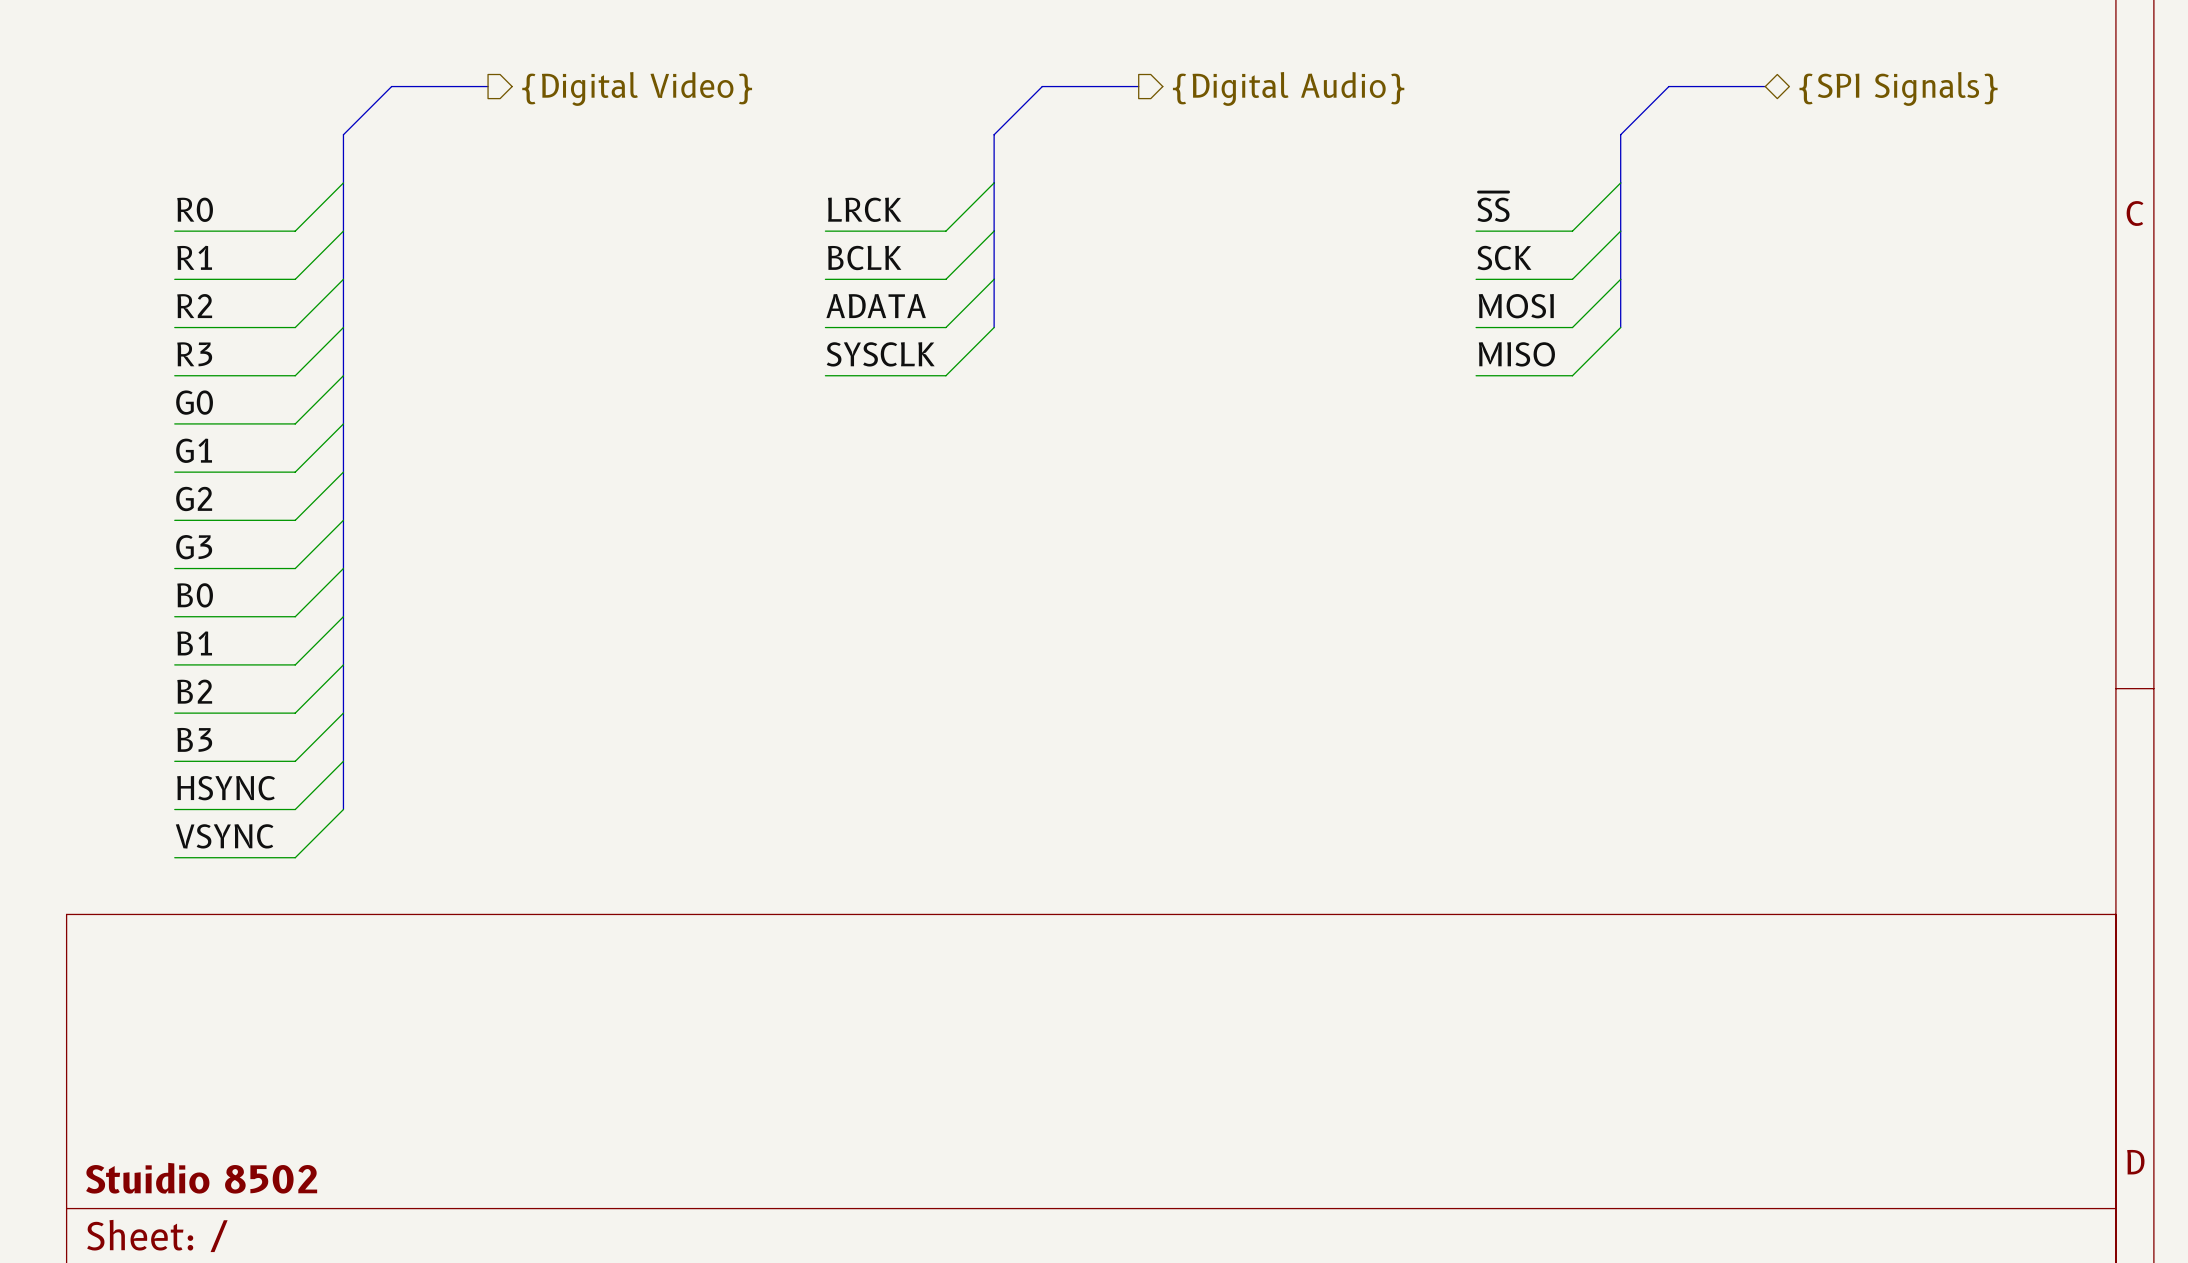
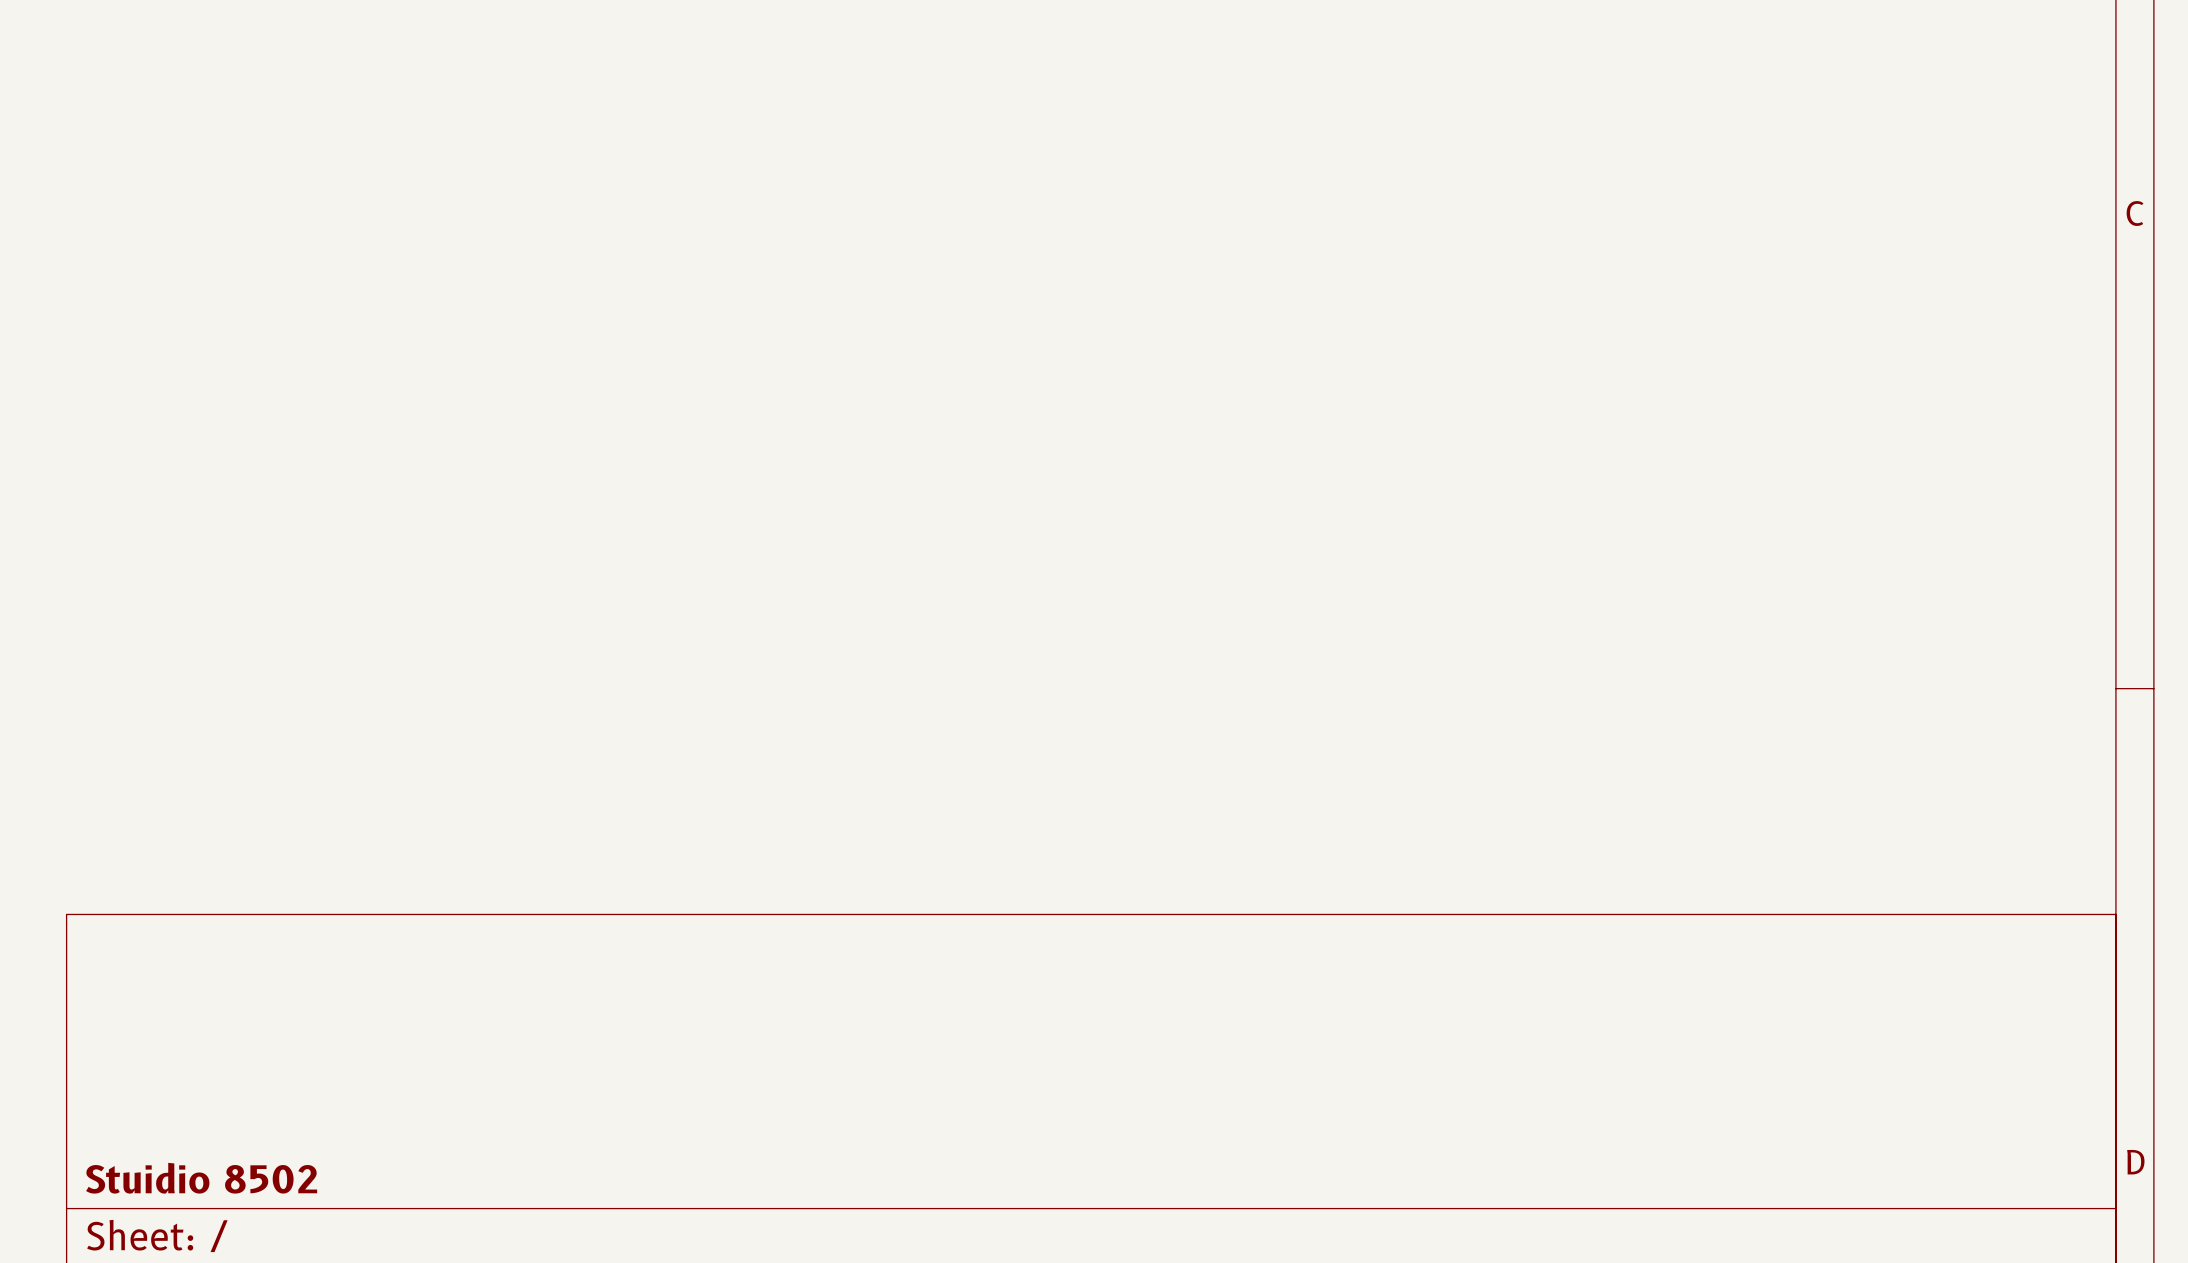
bus: (488, 86) (391, 86) (343, 134) (343, 809) -> none
bus: (1138, 86) (1042, 86) (994, 134) (994, 327) -> none
bus: (1765, 86) (1668, 86) (1620, 134) (1620, 327) -> none
hierarchical label: {Digital Video} (637, 88) -> none
hierarchical label: {Digital Audio} (1288, 88) -> none
hierarchical label: {SPI Signals} (1898, 88) -> none
wire: (343, 182) (295, 231) (174, 231) -> none
wire: (994, 182) (945, 231) (825, 231) -> none
wire: (1620, 182) (1572, 231) (1476, 231) -> none
label: ~{SS} (1493, 207) -> none
label: R0 (195, 209) -> none
label: LRCK (864, 209) -> none
wire: (343, 231) (295, 279) (174, 279) -> none
wire: (994, 231) (945, 279) (825, 279) -> none
wire: (1620, 231) (1572, 279) (1476, 279) -> none
label: R1 (194, 257) -> none
label: BCLK (864, 257) -> none
label: SCK (1504, 257) -> none
wire: (343, 279) (295, 327) (174, 327) -> none
wire: (994, 279) (945, 327) (825, 327) -> none
wire: (1620, 279) (1572, 327) (1476, 327) -> none
label: R2 (194, 306) -> none
label: ADATA (876, 306) -> none
label: MOSI (1516, 306) -> none
wire: (343, 327) (295, 375) (174, 375) -> none
wire: (994, 327) (945, 375) (825, 375) -> none
wire: (1620, 327) (1572, 375) (1476, 375) -> none
label: R3 (194, 354) -> none
label: SYSCLK (880, 354) -> none
label: MISO (1516, 354) -> none
wire: (343, 375) (295, 423) (174, 423) -> none
label: G0 (194, 402) -> none
wire: (343, 423) (295, 472) (174, 472) -> none
label: G1 (194, 450) -> none
wire: (343, 472) (295, 520) (174, 520) -> none
label: G2 (194, 498) -> none
wire: (343, 520) (295, 568) (174, 568) -> none
label: G3 (194, 547) -> none
wire: (343, 568) (295, 616) (174, 616) -> none
label: B0 (195, 595) -> none
wire: (343, 616) (295, 664) (174, 664) -> none
label: B1 (194, 643) -> none
wire: (343, 664) (295, 713) (174, 713) -> none
label: B2 (194, 691) -> none
wire: (343, 713) (295, 761) (174, 761) -> none
label: B3 (194, 739) -> none
wire: (343, 761) (295, 809) (174, 809) -> none
label: HSYNC (226, 788) -> none
wire: (343, 809) (295, 857) (174, 857) -> none
label: VSYNC (224, 836) -> none

